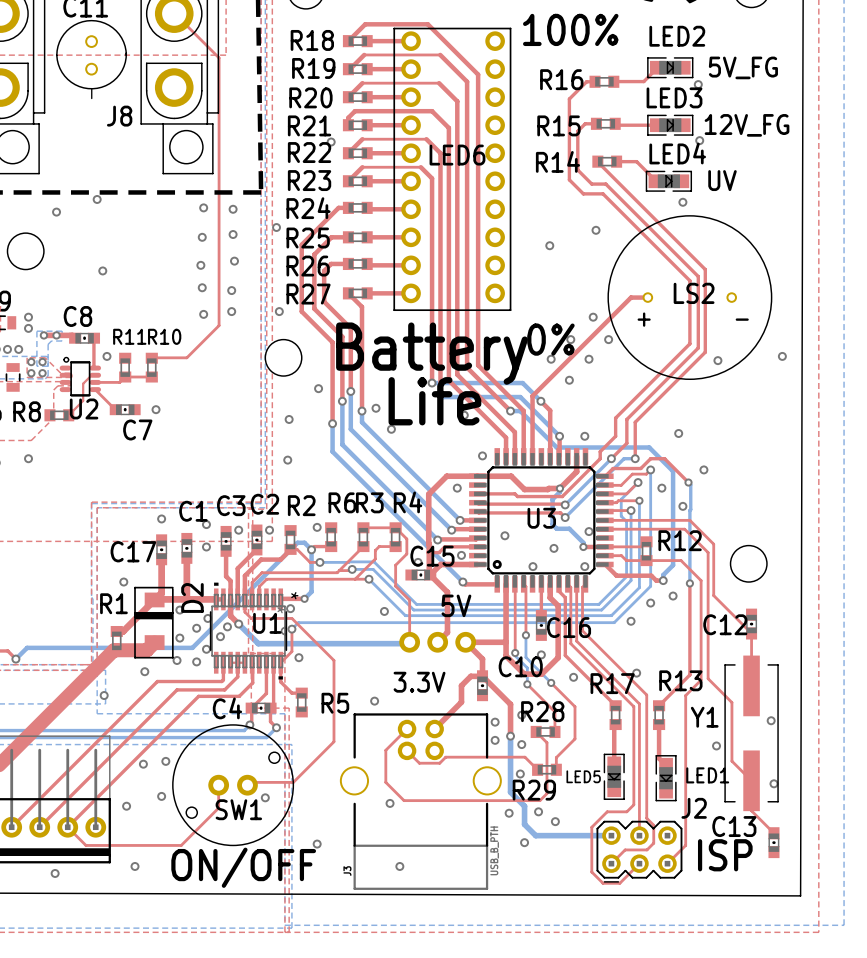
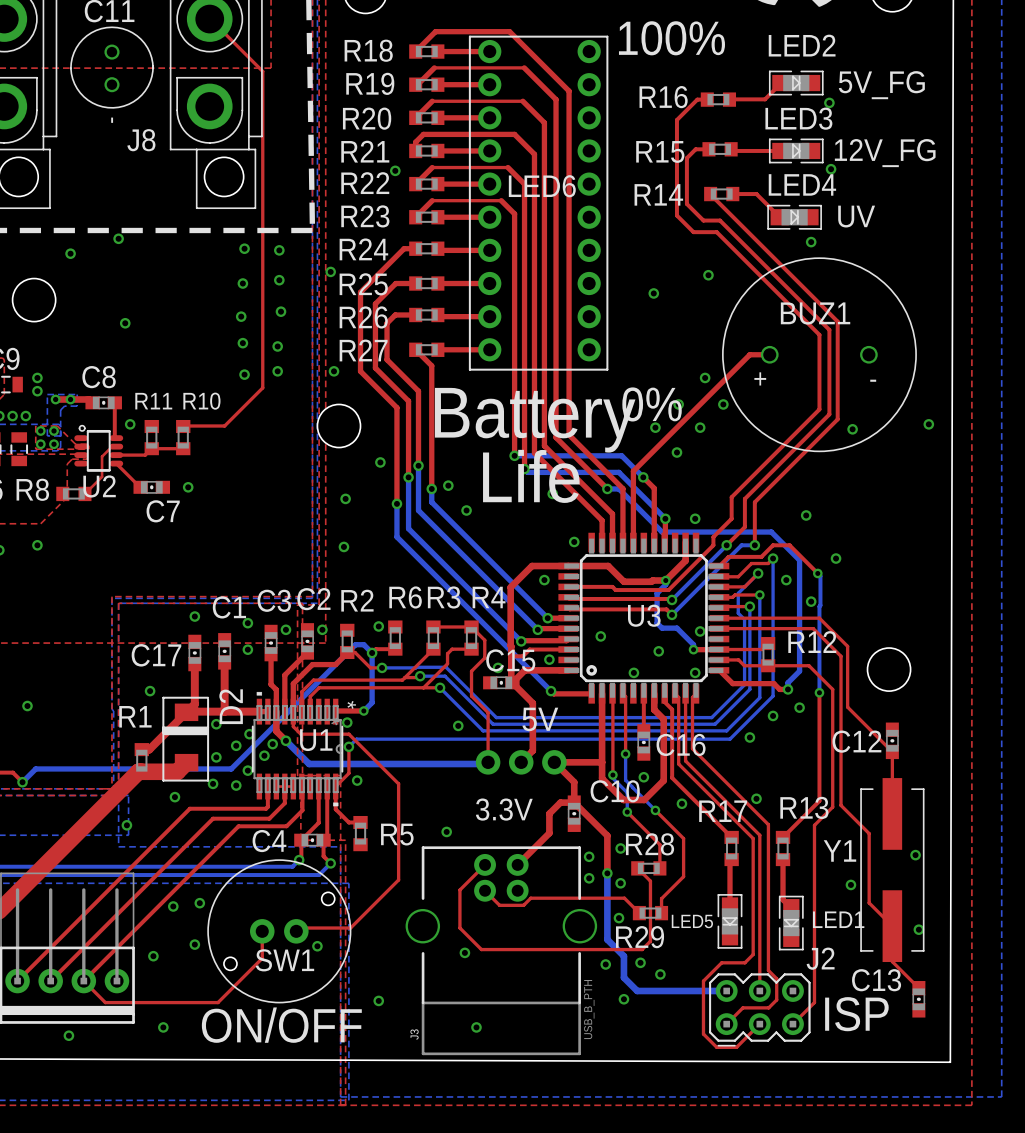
LS2: (689, 297) -> none
BUZ1: none -> (819, 354)
via: none -> (27, 706)

